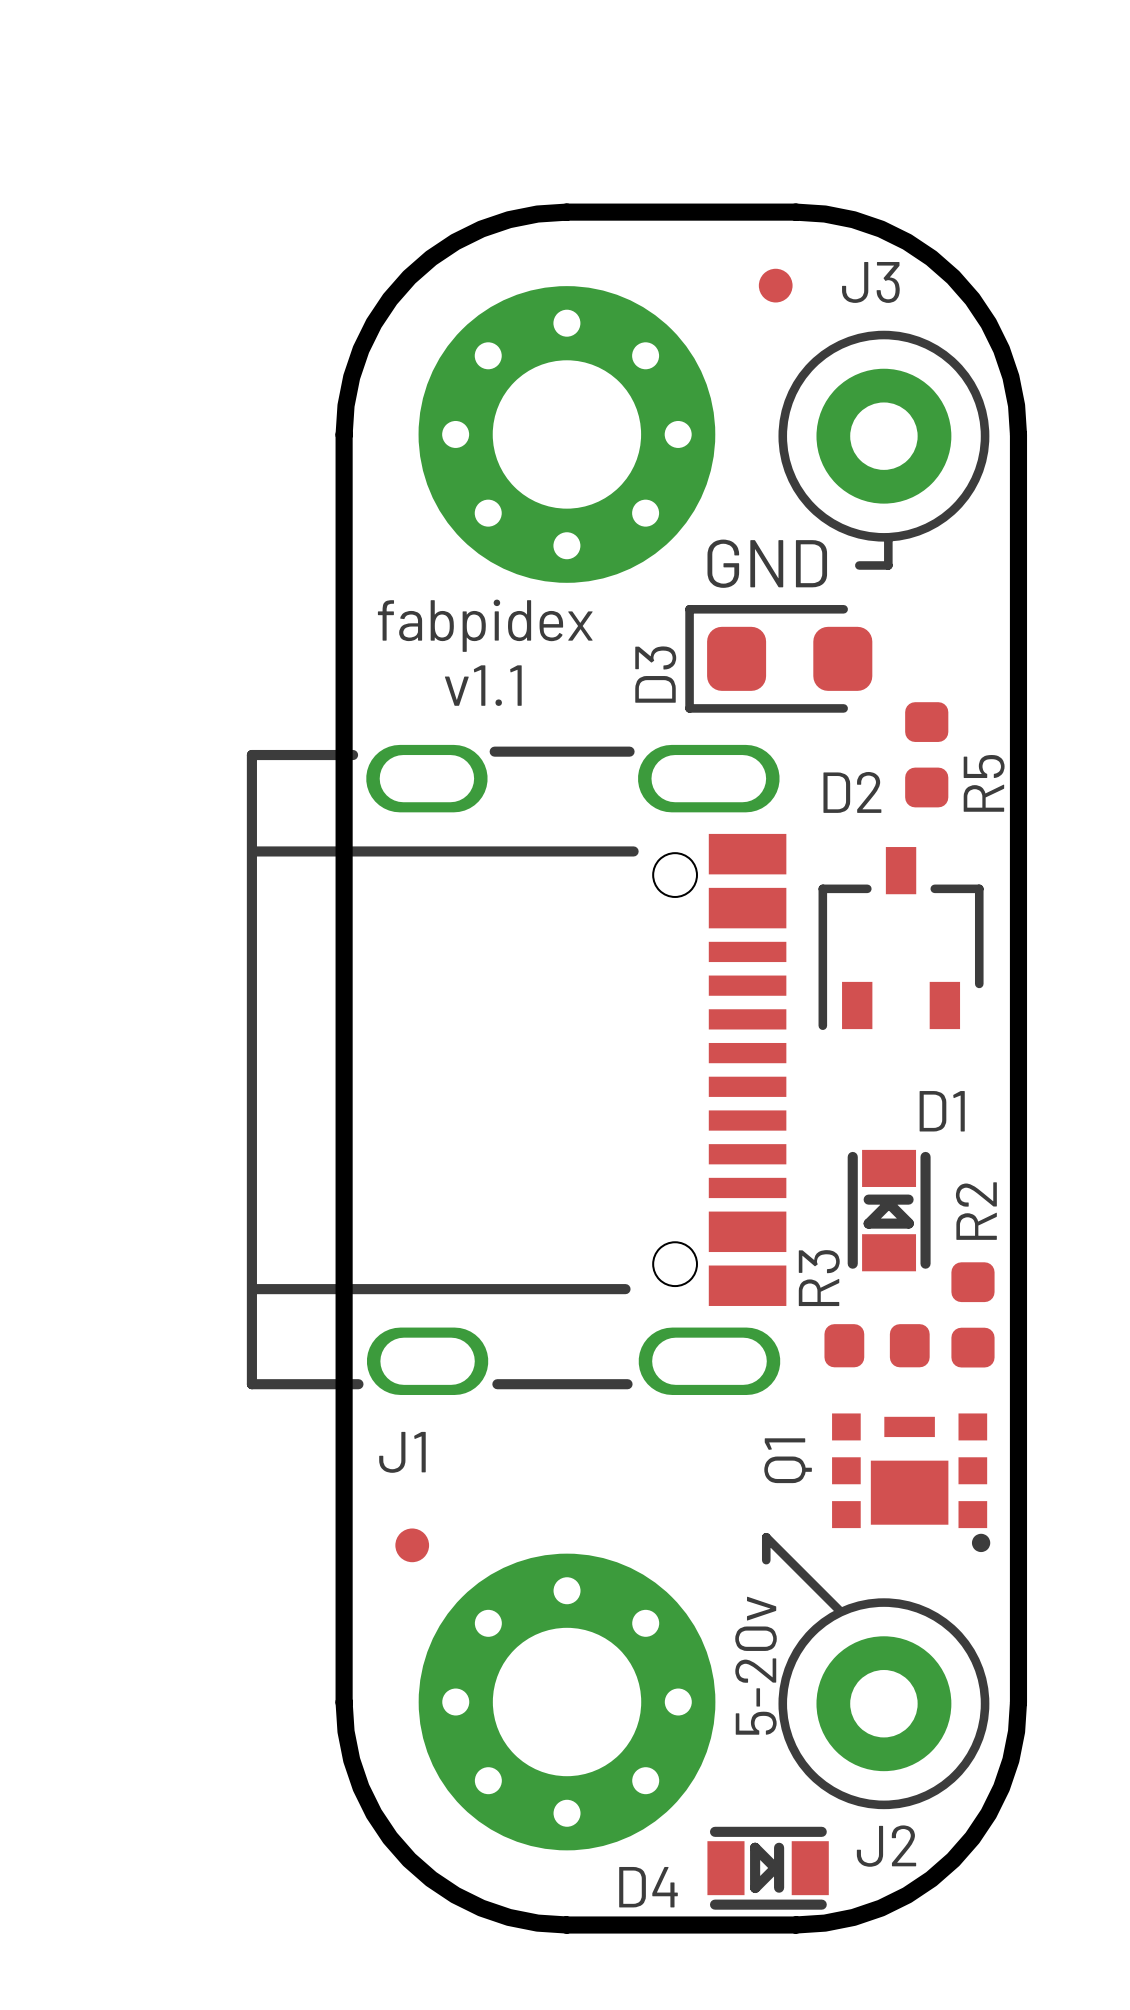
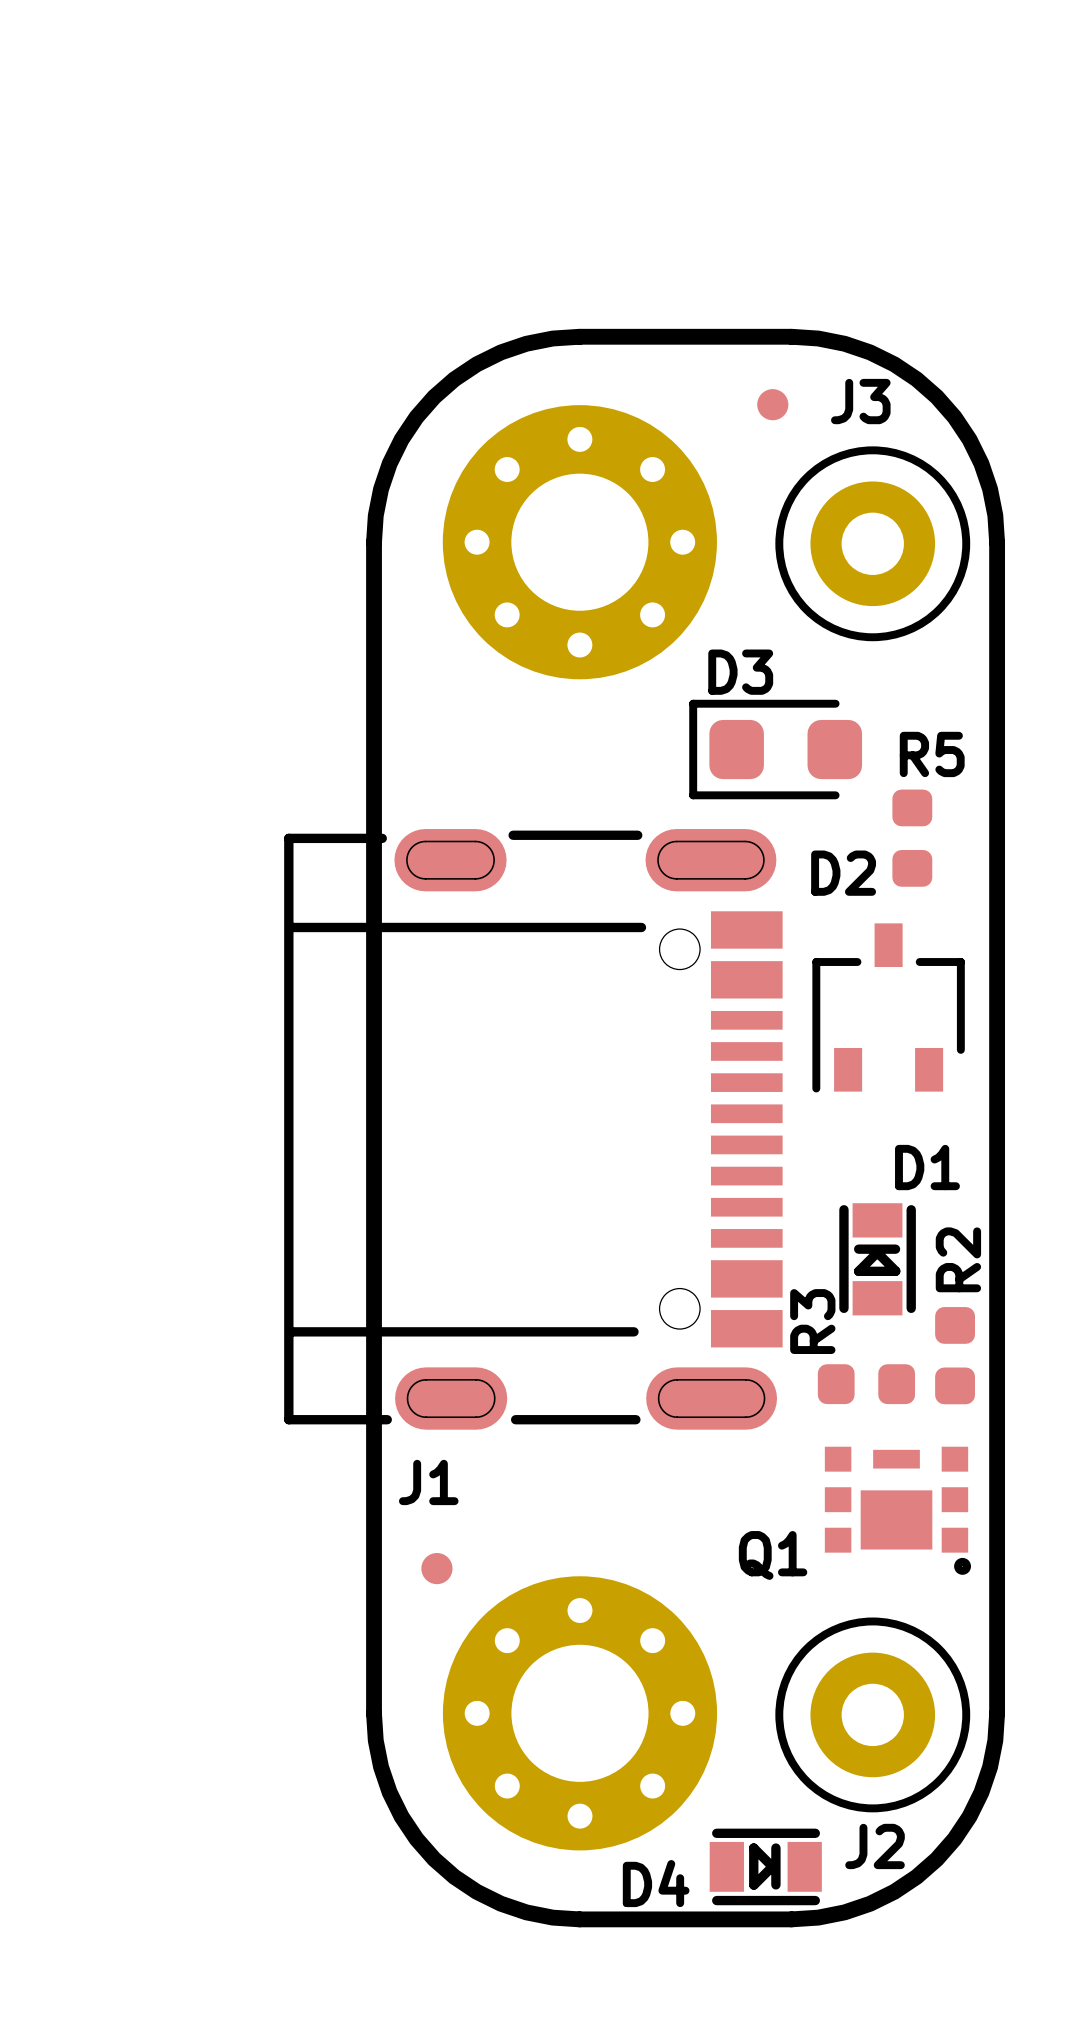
line: (888, 538) (888, 565) (859, 565) -> none
text: GND (767, 563) -> none
text: fabpidex (485, 625) -> none
D3 name rotation: 0° (655, 674) -> 90° clockwise (740, 672)
D3 name position: D3 (655, 674) -> D3 (740, 672)
text: v1.1 (483, 685) -> none
J1 footprint: [246, 744, 787, 1395] -> [284, 829, 783, 1430]
R5 name rotation: 0° (984, 783) -> 90° clockwise (932, 754)
R5 name position: R5 (984, 783) -> R5 (932, 754)
Q1 name rotation: 0° (788, 1460) -> 90° clockwise (773, 1555)
line: (766, 1560) (766, 1537) (839, 1610) -> none
text: 5-20v (756, 1665) -> none

